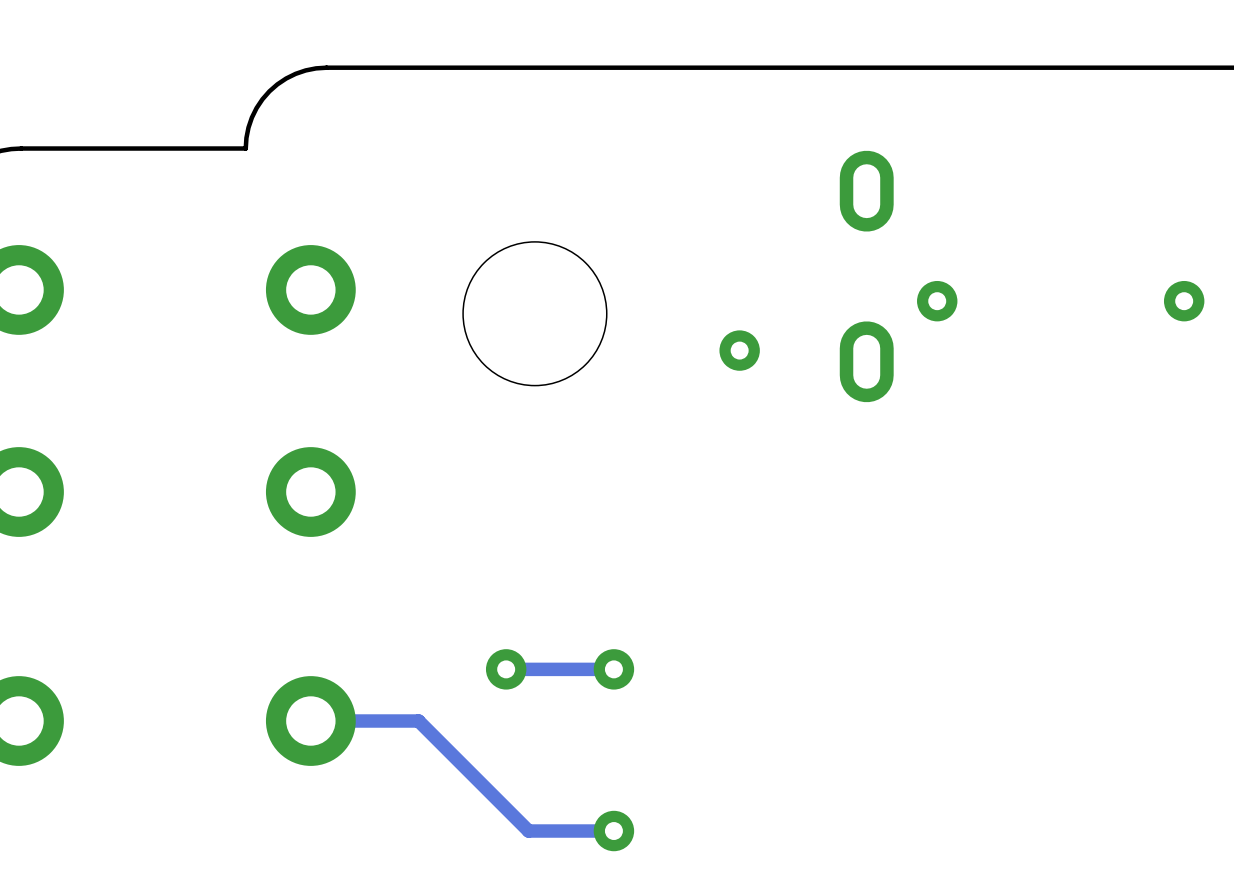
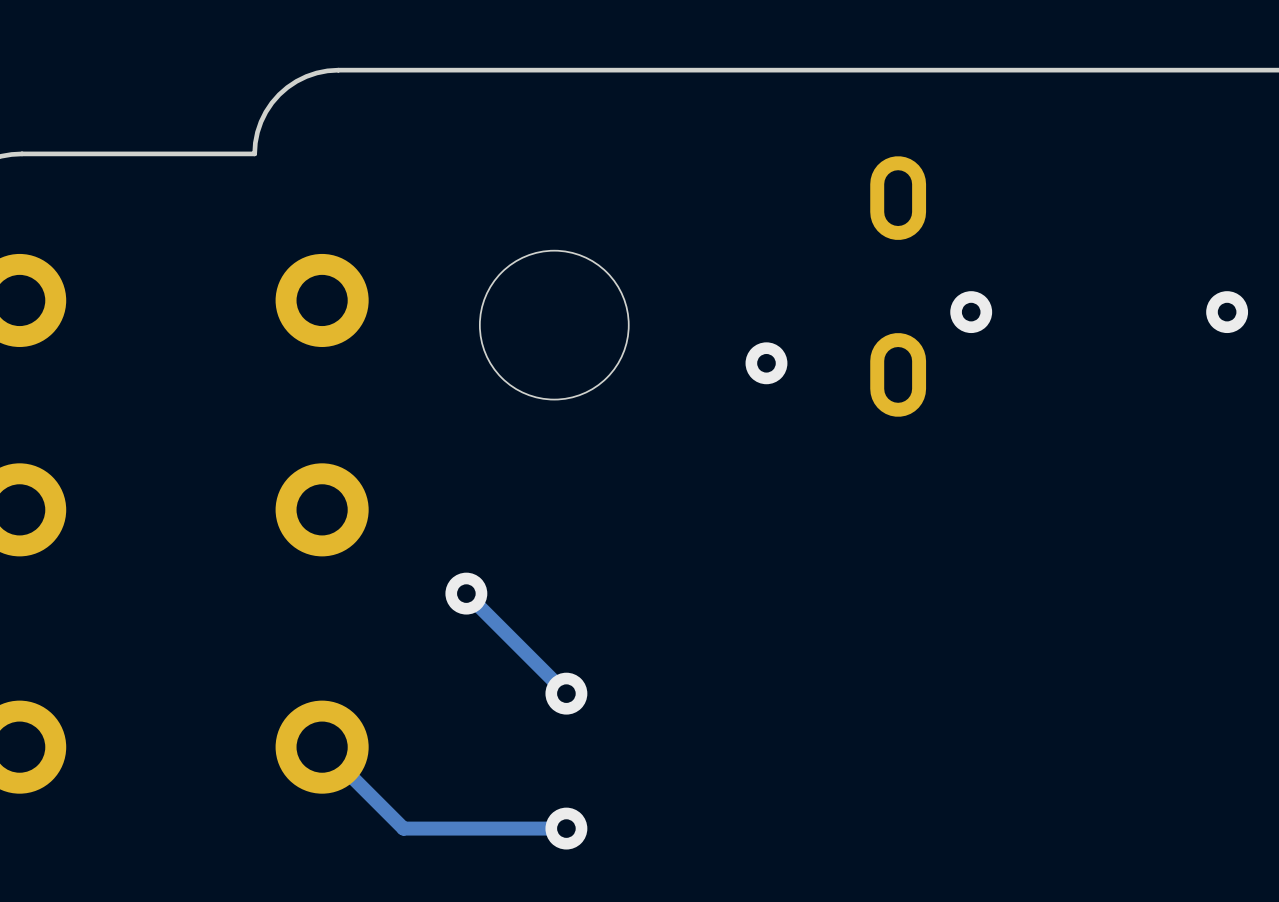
track: none -> (466, 593) (566, 693)
via: none -> (466, 593)
via position: (506, 669) -> (566, 693)
track: (613, 669) (506, 669) -> none
via: (613, 669) -> none
track: (310, 721) (418, 721) (528, 831) (613, 831) -> (322, 747) (403, 828) (566, 828)
via: none -> (566, 828)
via: (613, 831) -> none

